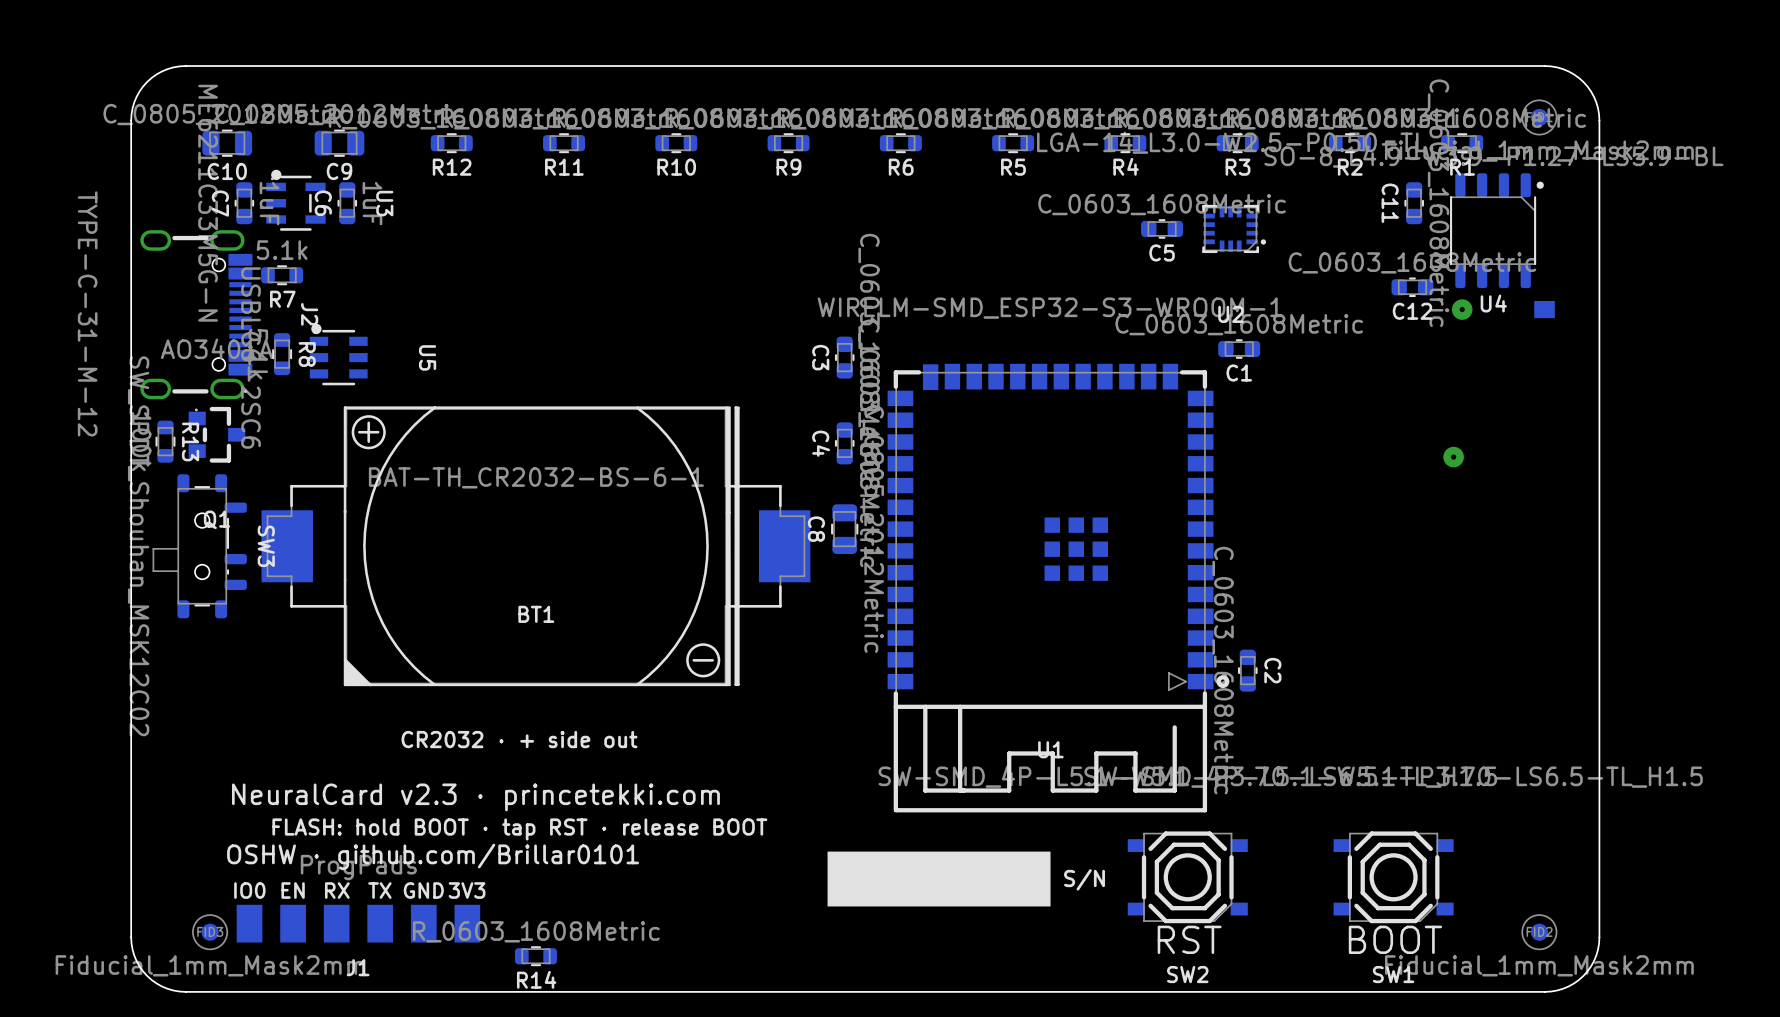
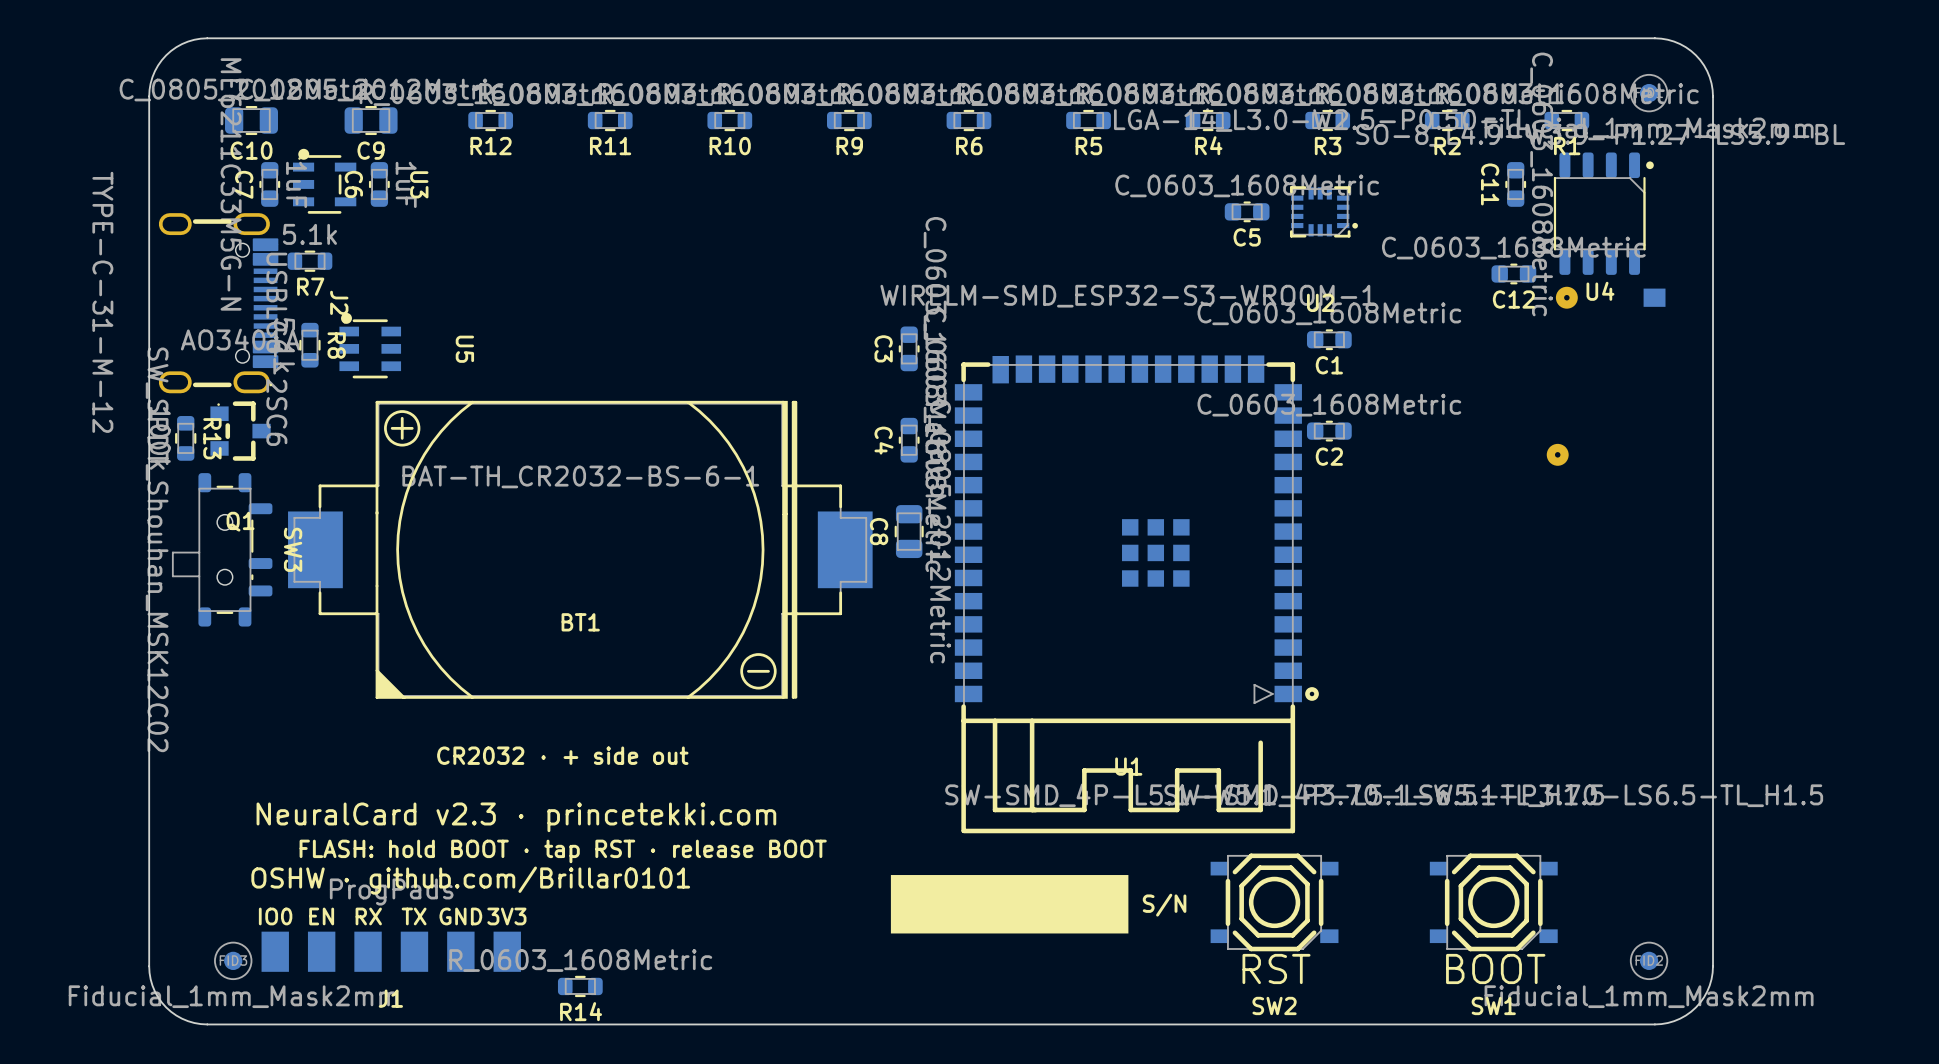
C2 rotation: 0° (1247, 670) -> 90° clockwise (1329, 431)
C2 position: (1247, 670) -> (1329, 431)

